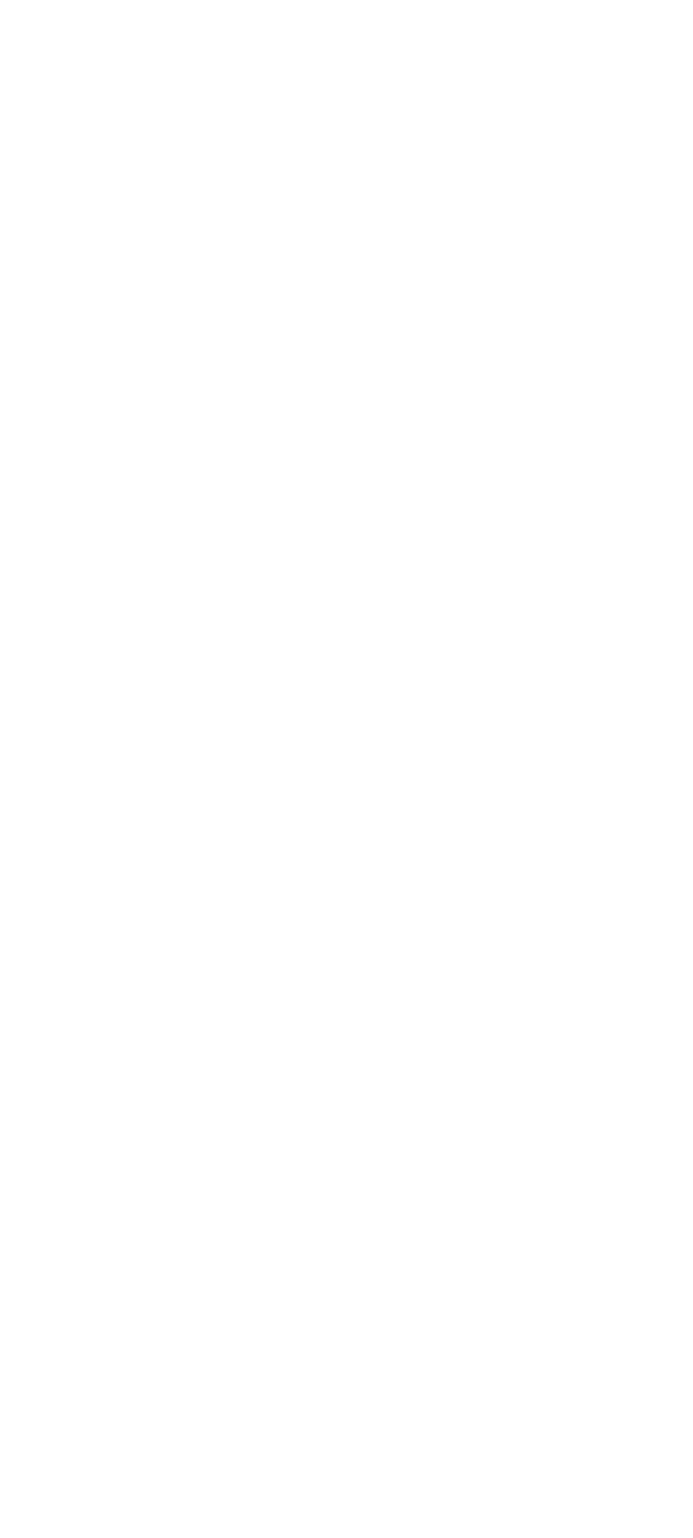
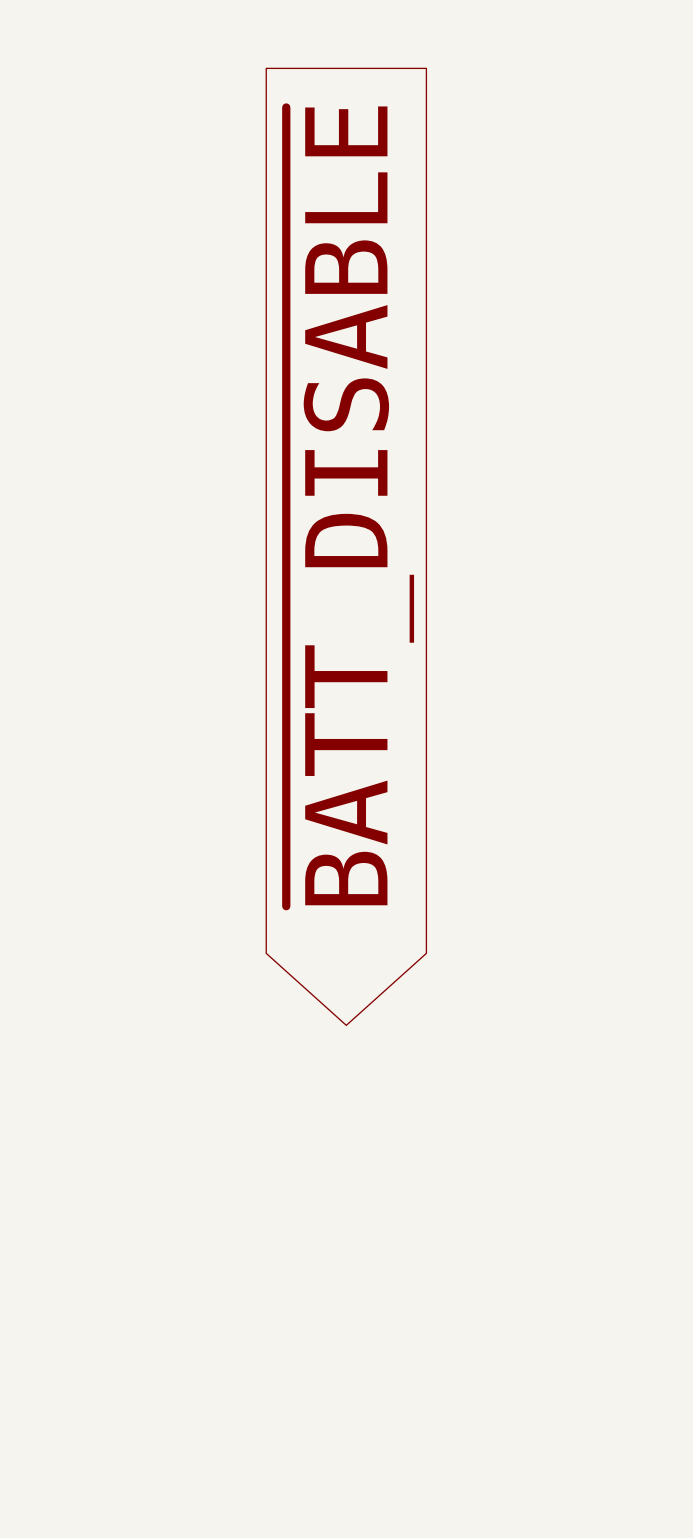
global label: none -> ~{BATT_DISABLE} (350, 506)

